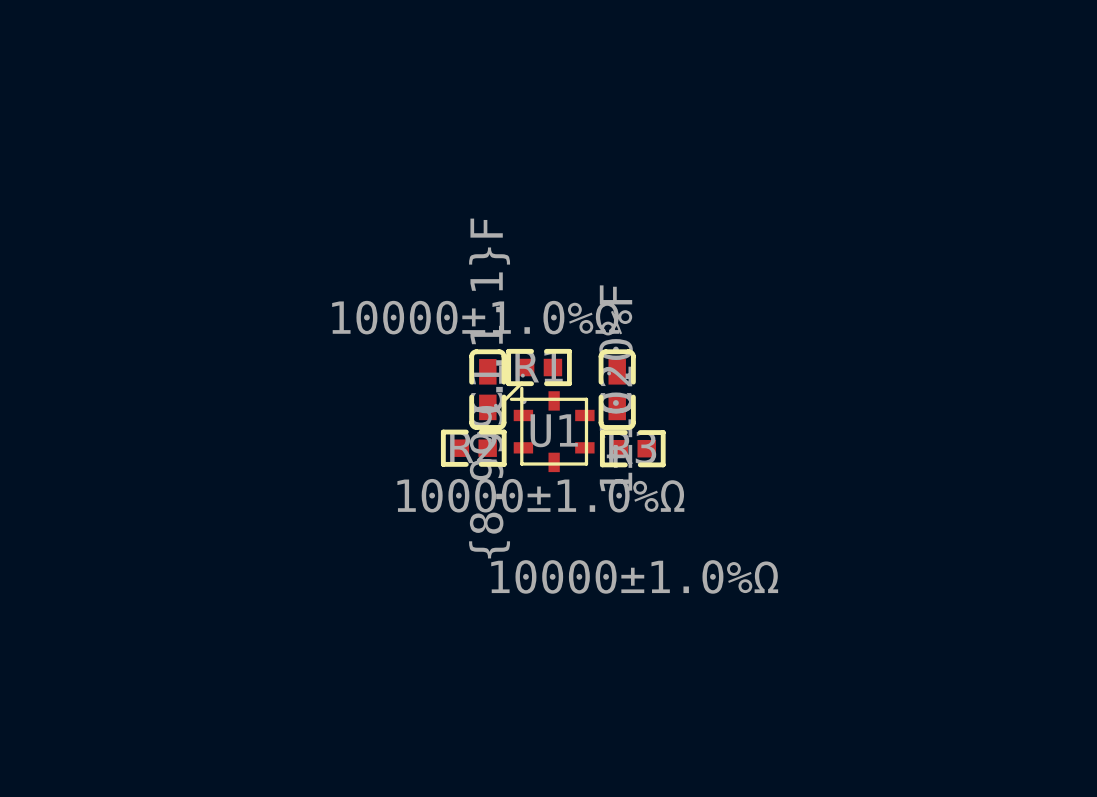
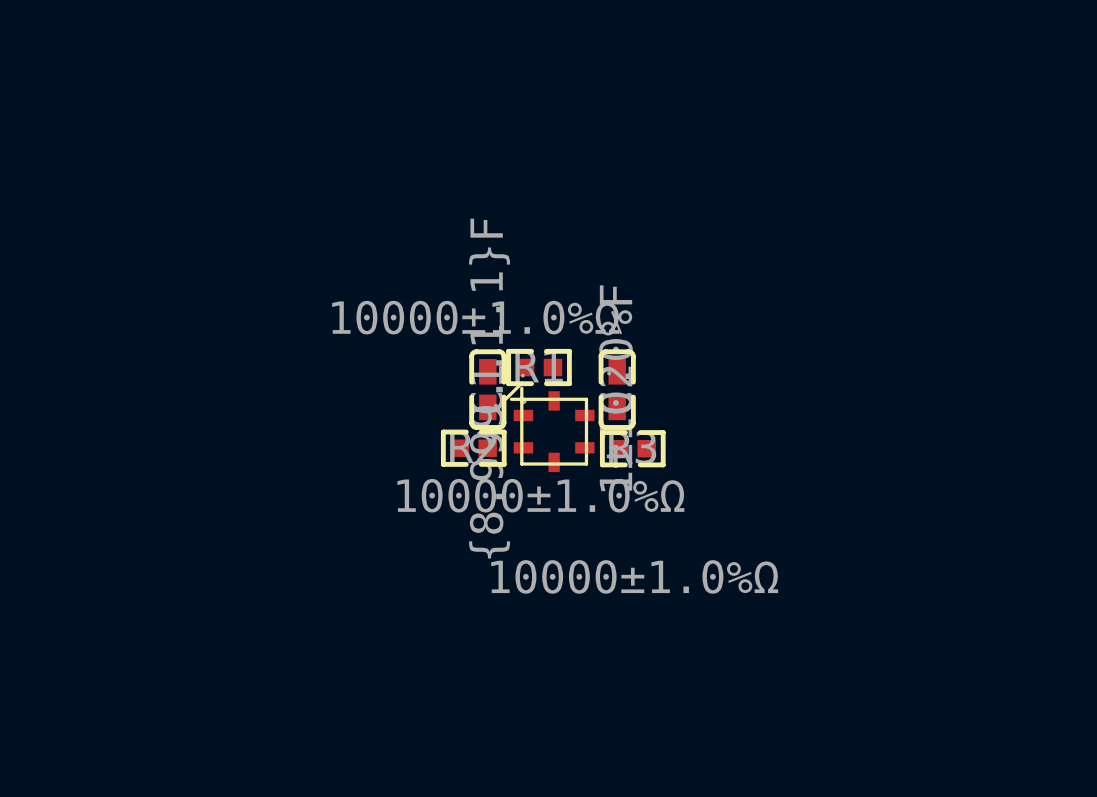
U1 name: U1 (554, 430) -> none

